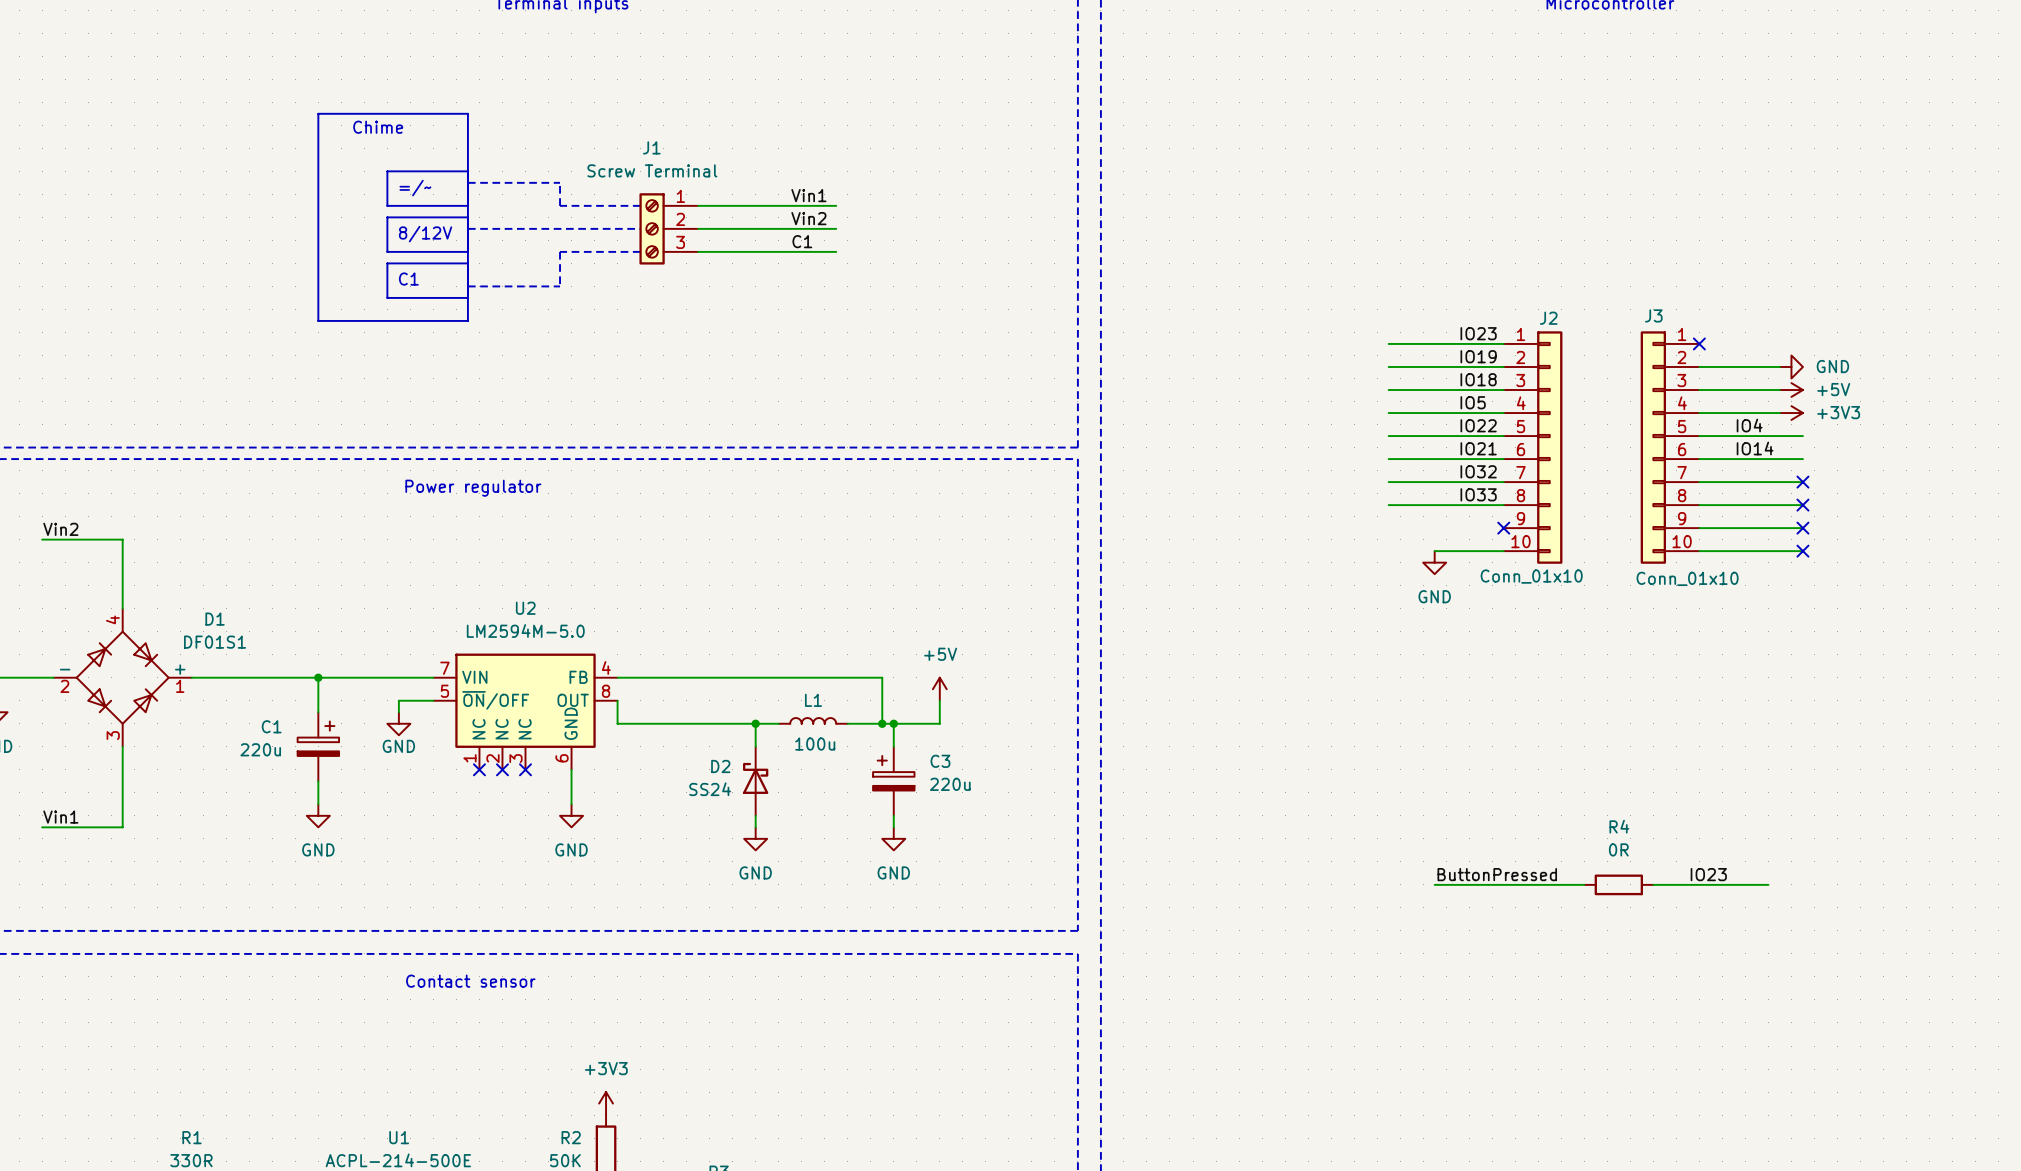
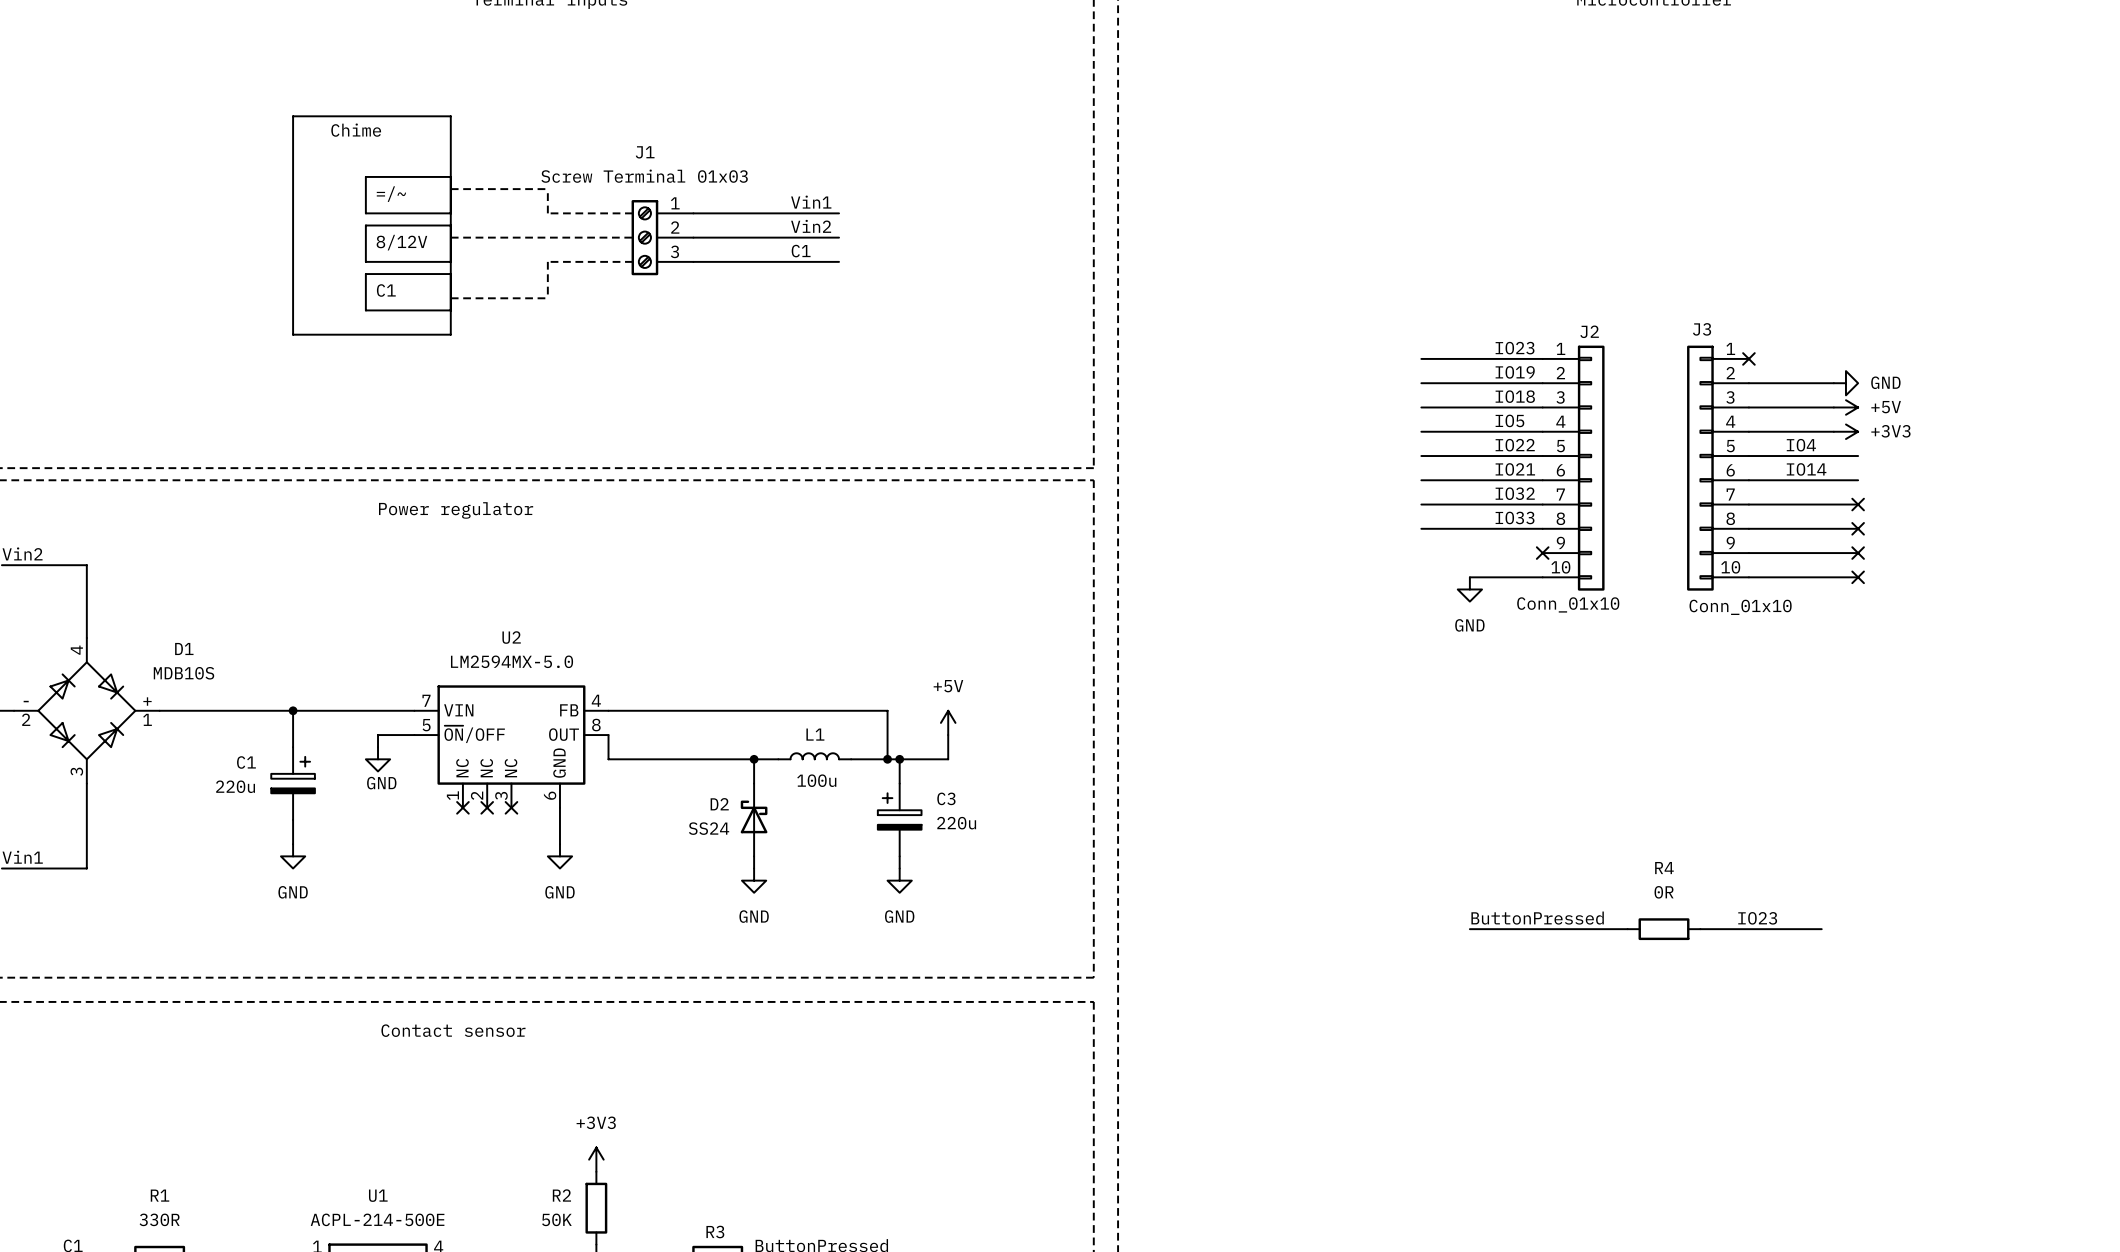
J1 value: Screw Terminal (652, 170) -> Screw Terminal 01x03 (644, 176)
U2 value: LM2594M-5.0 (525, 630) -> LM2594MX-5.0 (512, 661)
D1 value: DF01S1 (215, 642) -> MDB10S (183, 673)

